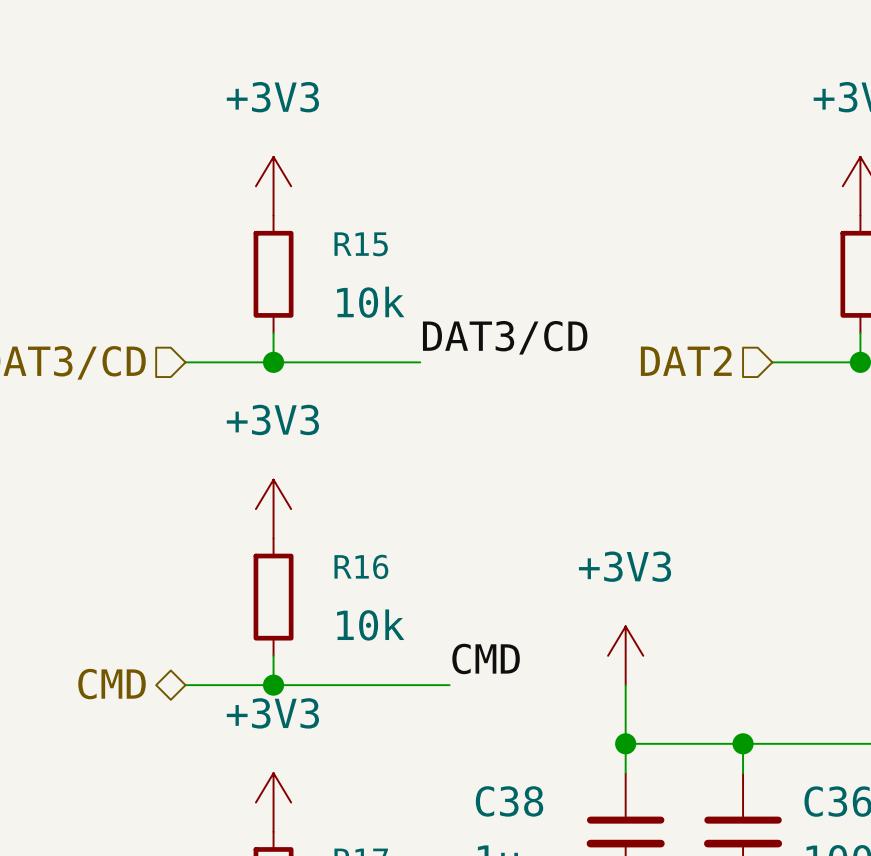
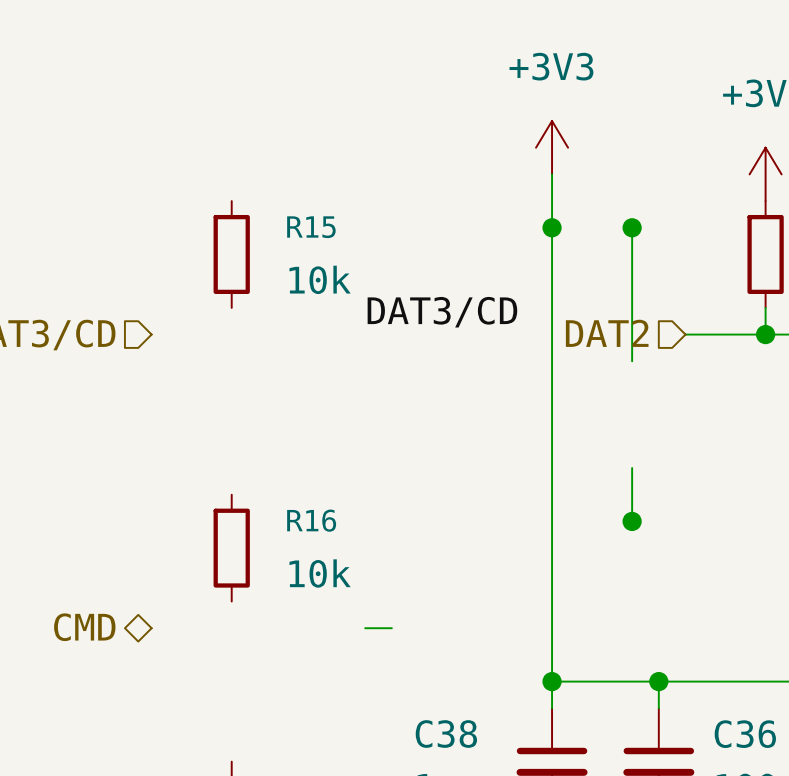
power symbol: none -> +3V3 (552, 147)
power symbol: +3V3 (273, 186) -> none
wire: none -> (552, 174) (552, 628)
junction: none -> (552, 227)
wire: none -> (632, 227) (632, 361)
junction: none -> (632, 227)
wire: (273, 333) (273, 362) -> none
wire: (185, 362) (420, 362) -> none
junction: (273, 362) -> none
power symbol: +3V3 (273, 509) -> none
wire: none -> (632, 468) (632, 521)
junction: none -> (632, 521)
wire: (273, 655) (273, 685) -> none
power symbol: +3V3 (625, 655) -> none
label: CMD (486, 658) -> none
wire: (185, 685) (420, 685) -> none
junction: (273, 685) -> none
power symbol: +3V3 (273, 802) -> none

